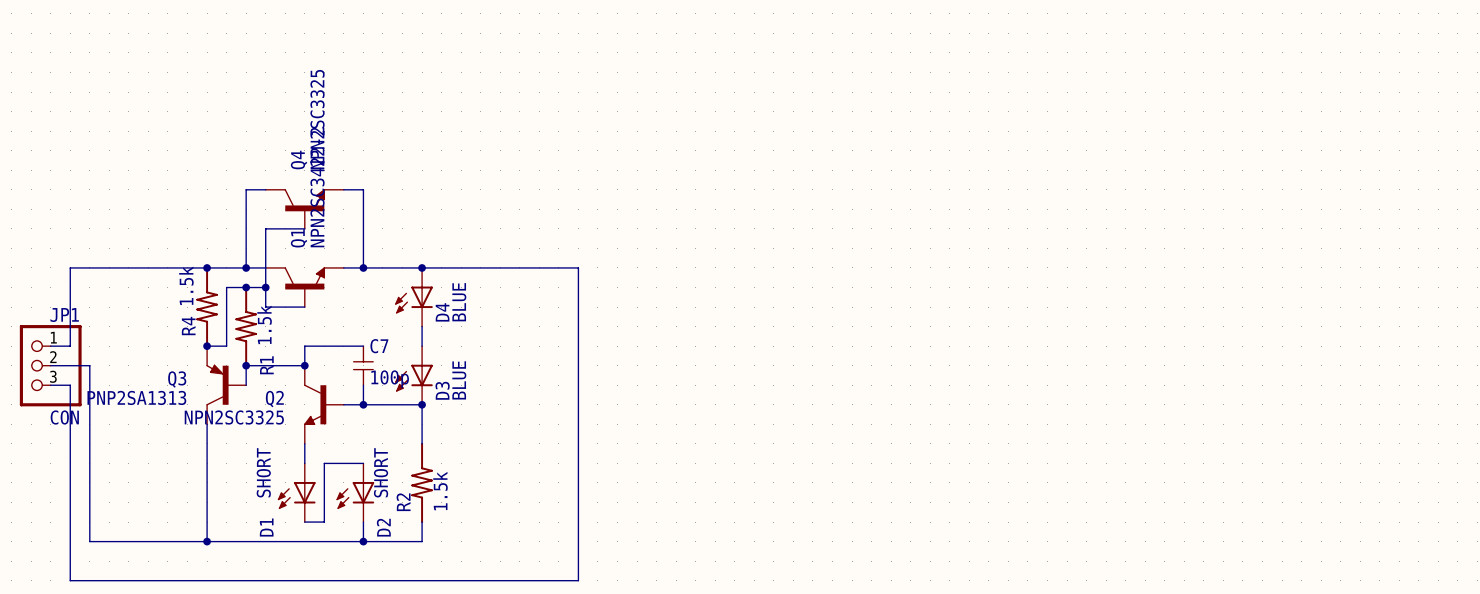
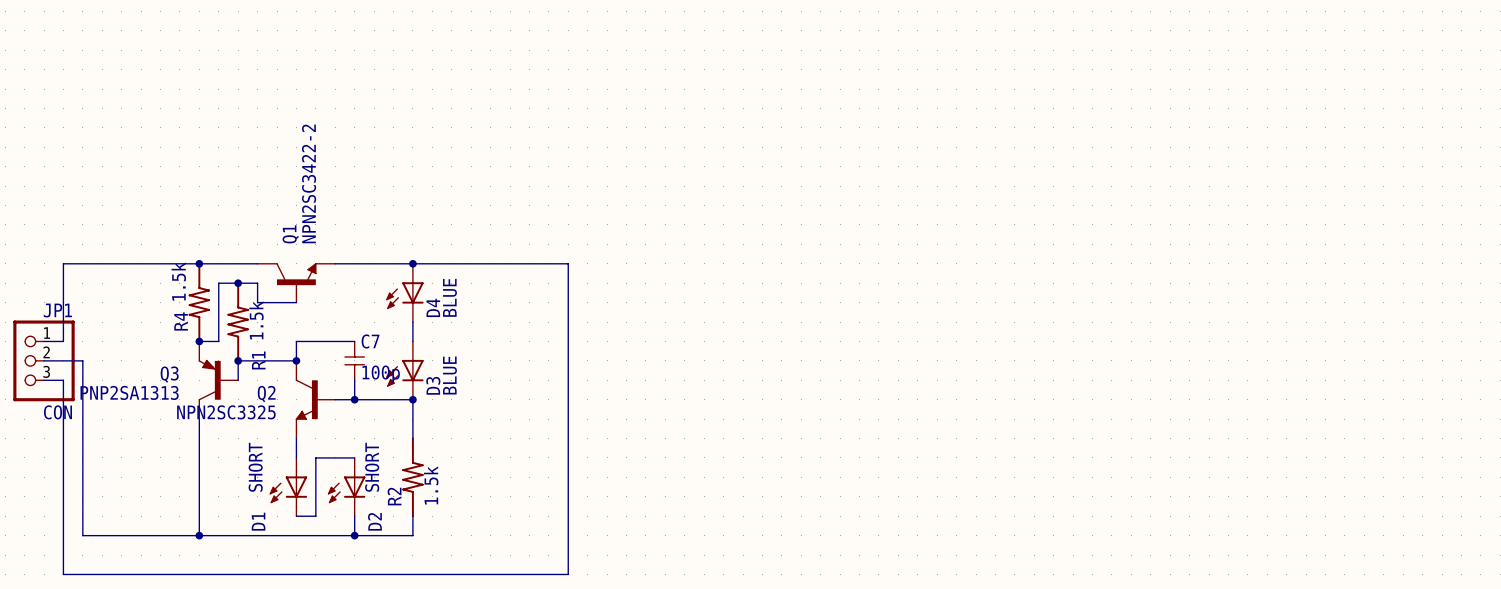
wire: (265, 189) (246, 189) (246, 267) -> none
wire: (343, 189) (363, 189) (363, 267) -> none
Q4: NPN2SC3325 (304, 209) -> none
wire: (304, 228) (265, 228) (265, 287) -> none
junction: (246, 267) -> none
junction: (363, 267) -> none
junction: (265, 287) -> none

